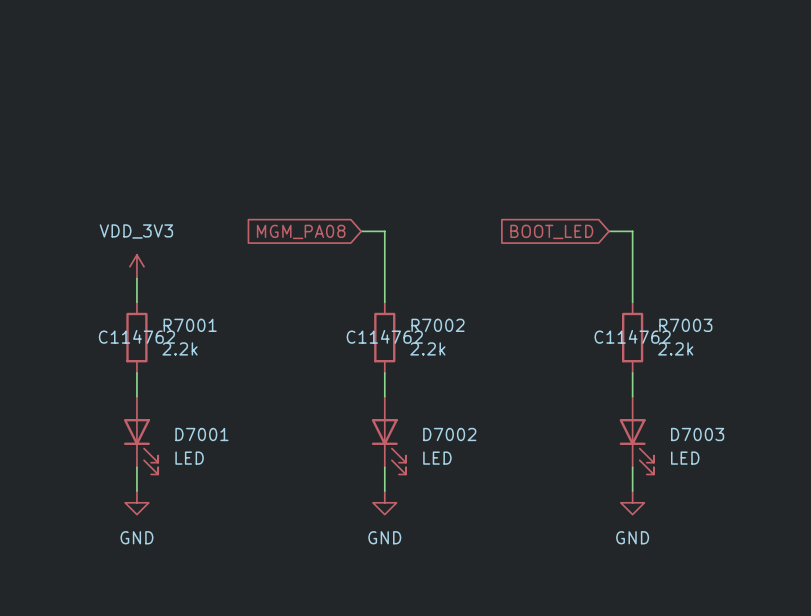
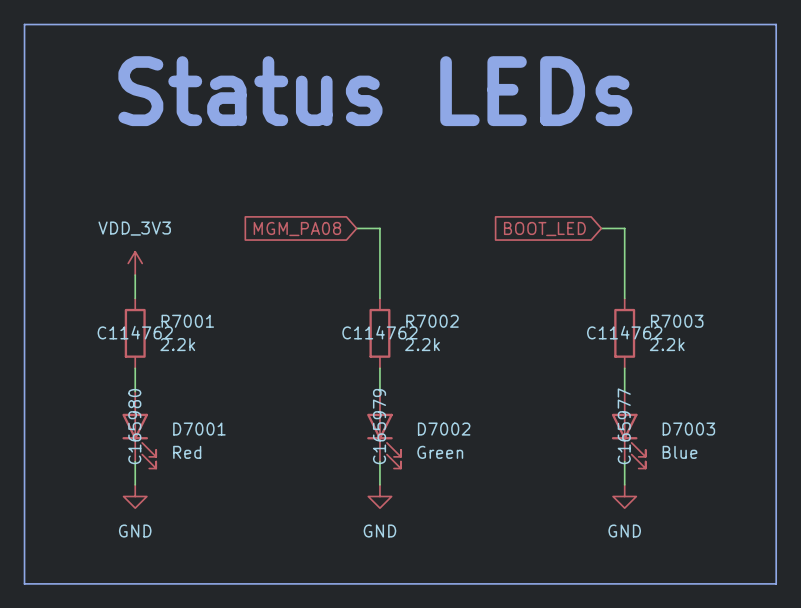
line: none -> (24, 24) (776, 24) (776, 583) (24, 583) (24, 24)
text: none -> Status LEDs (375, 91)
D7001 text: none -> C165980 (134, 426)
D7002 text: none -> C165979 (379, 426)
D7003 text: none -> C165977 (624, 426)
D7001 value: LED (189, 458) -> Red (187, 452)
D7002 value: LED (437, 458) -> Green (440, 452)
D7003 value: LED (685, 458) -> Blue (679, 452)

